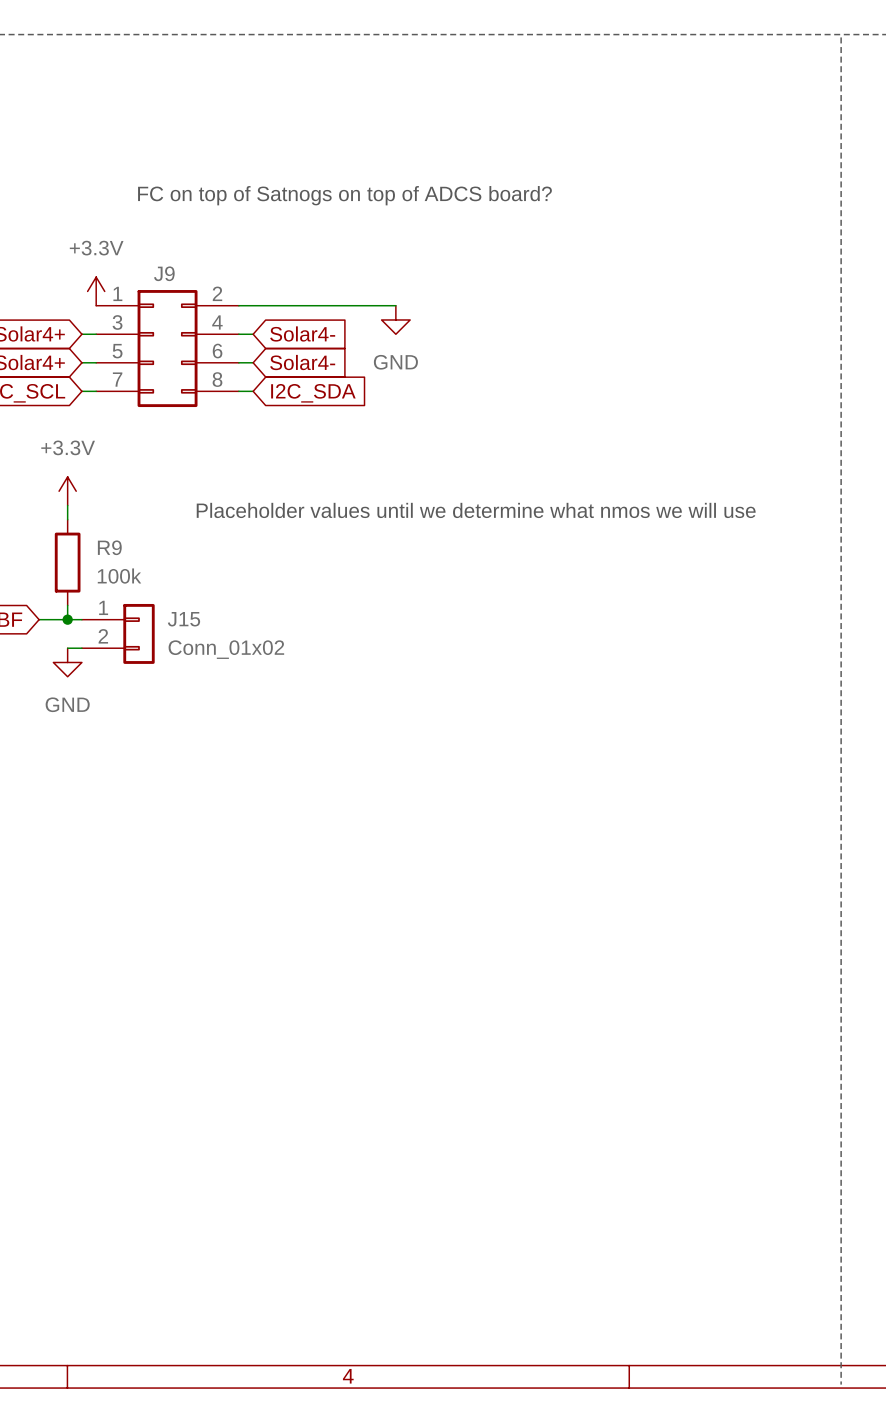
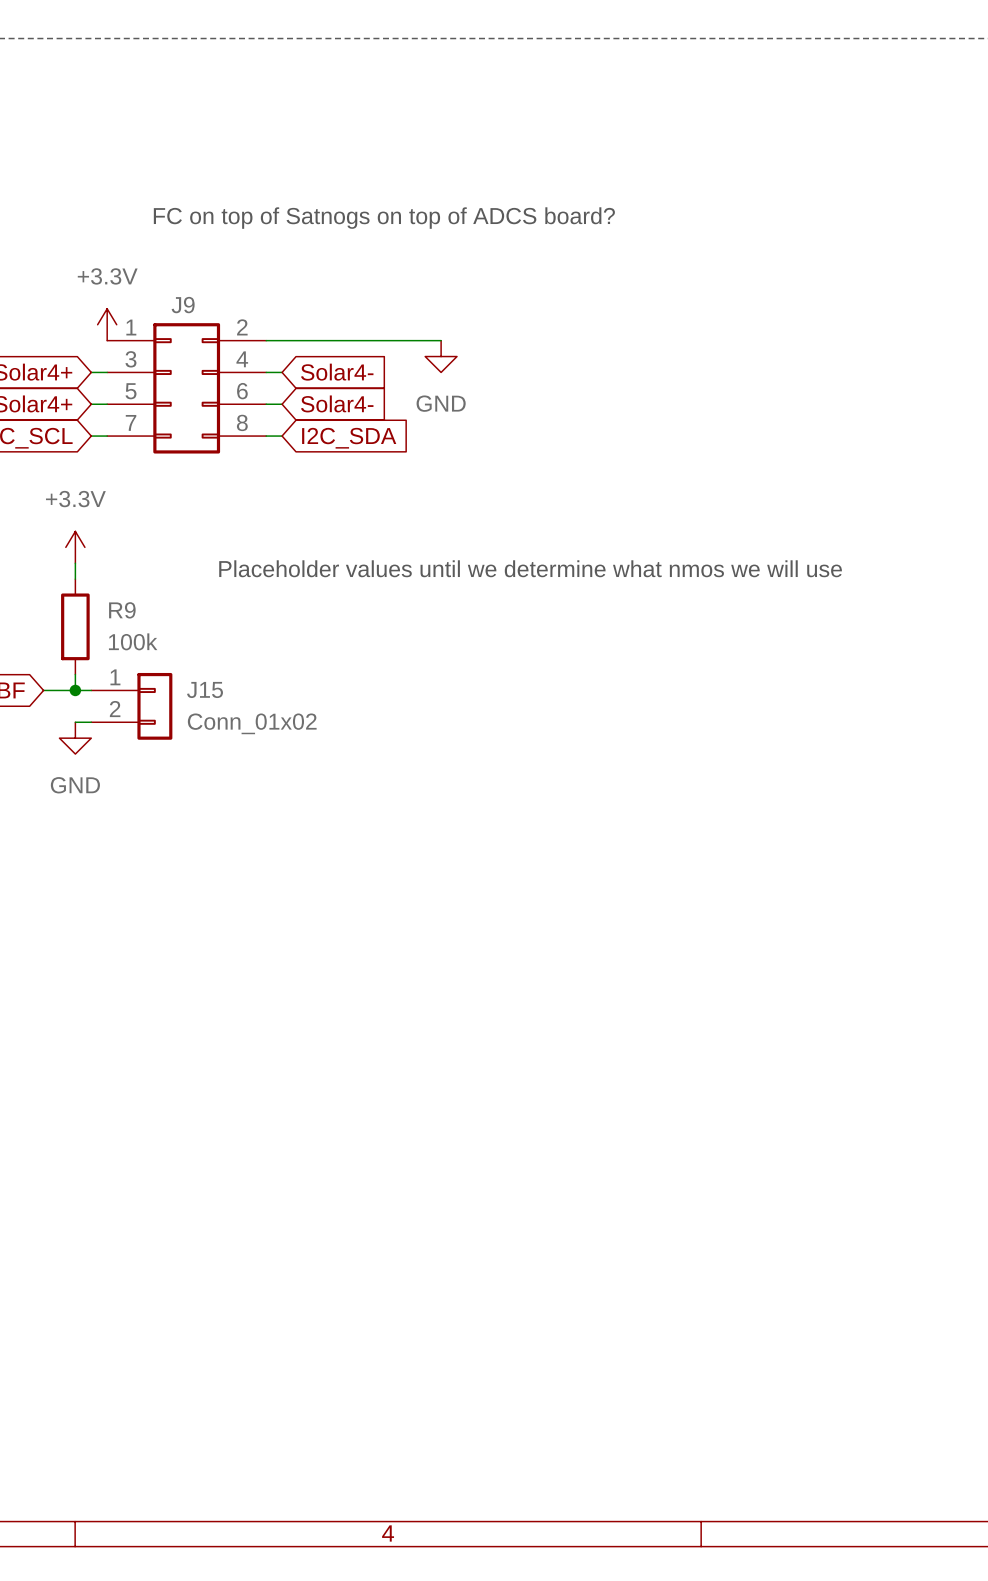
line: (841, 37) (841, 1384) -> none

